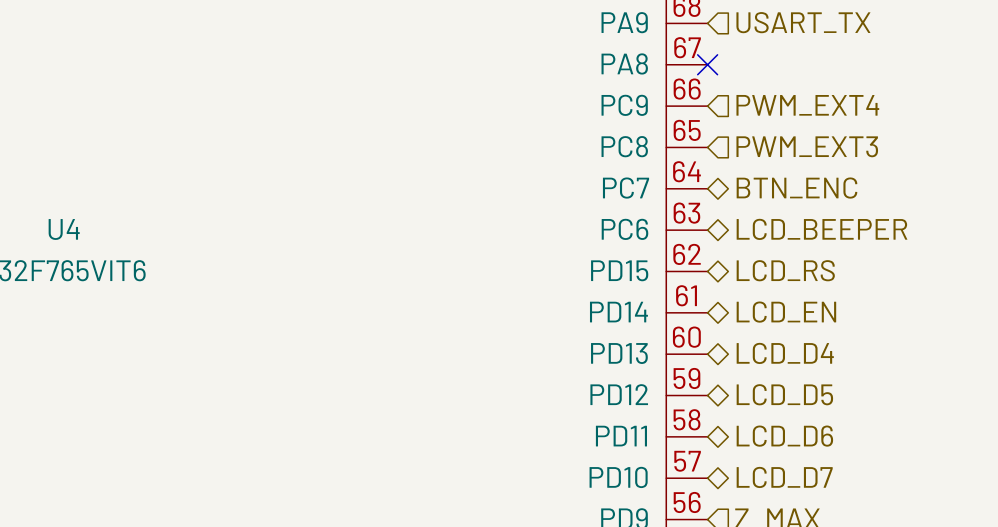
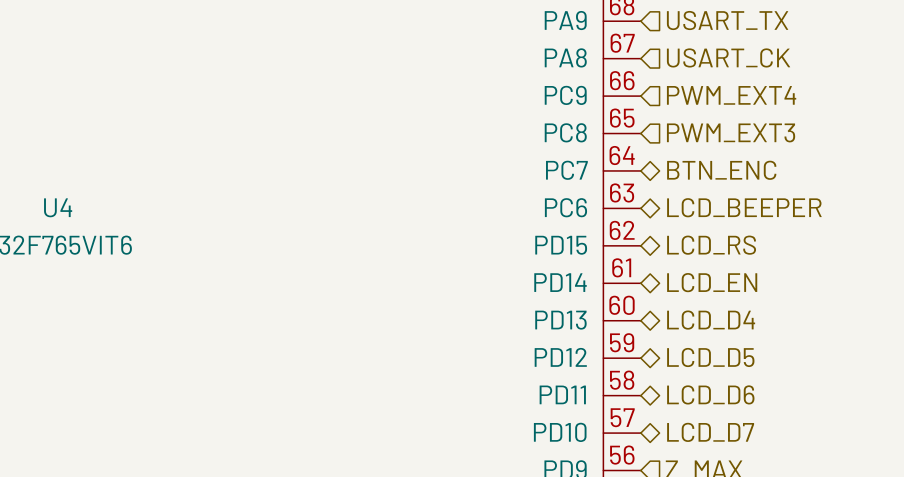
no-connect mark: (707, 64) -> none
hierarchical label: none -> USART_CK (728, 57)

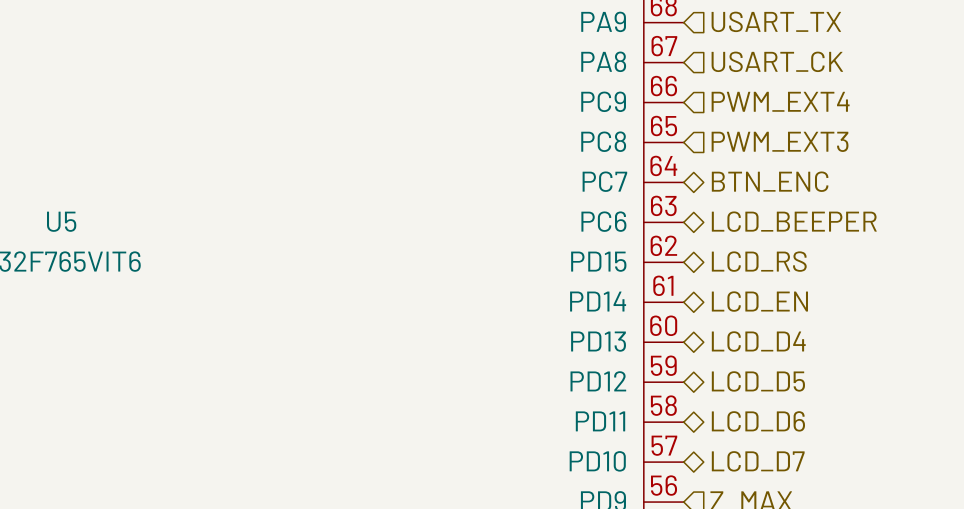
U4 name: U4 (58, 207) -> U5 (61, 221)

